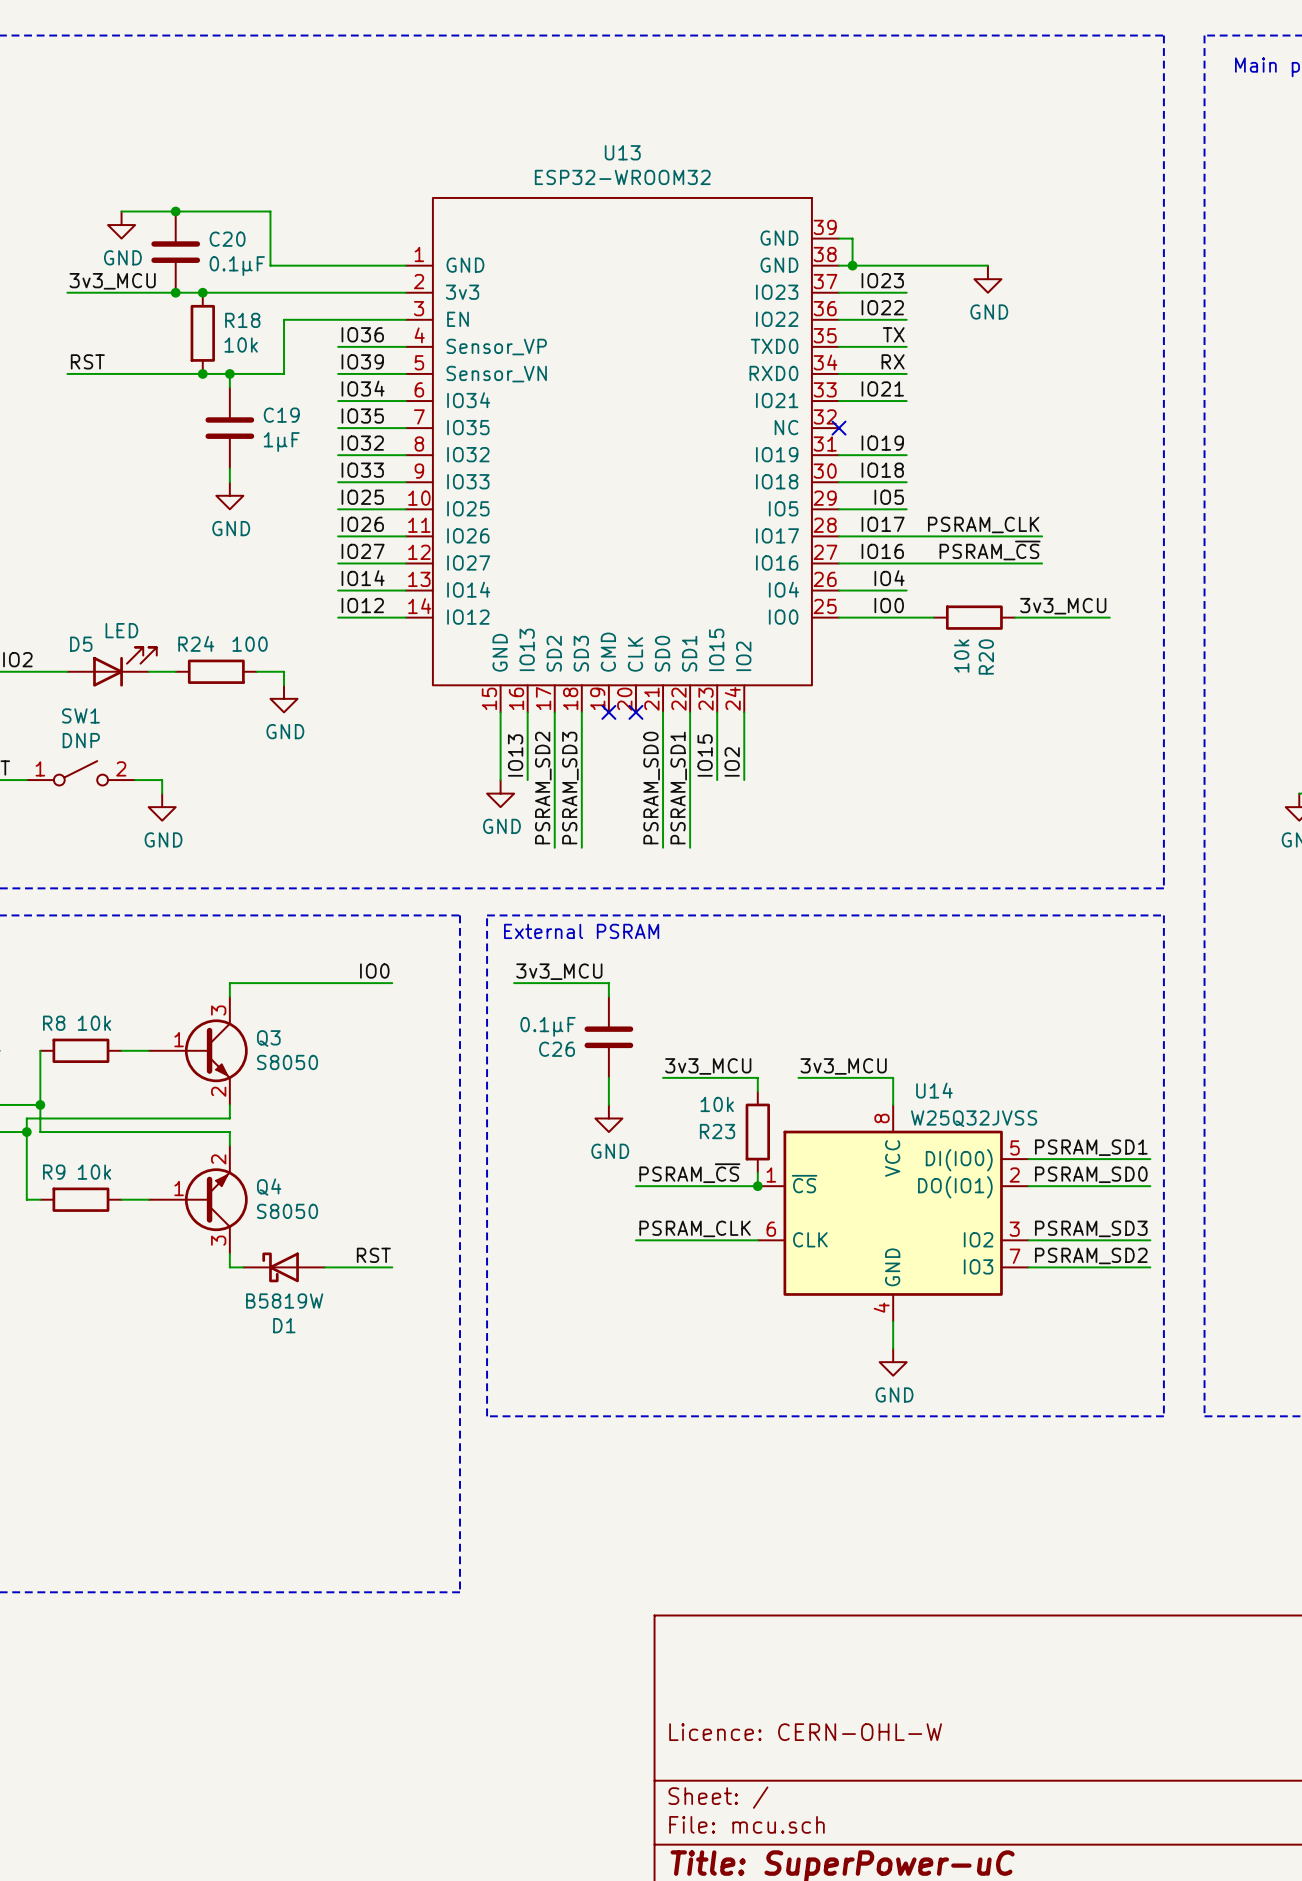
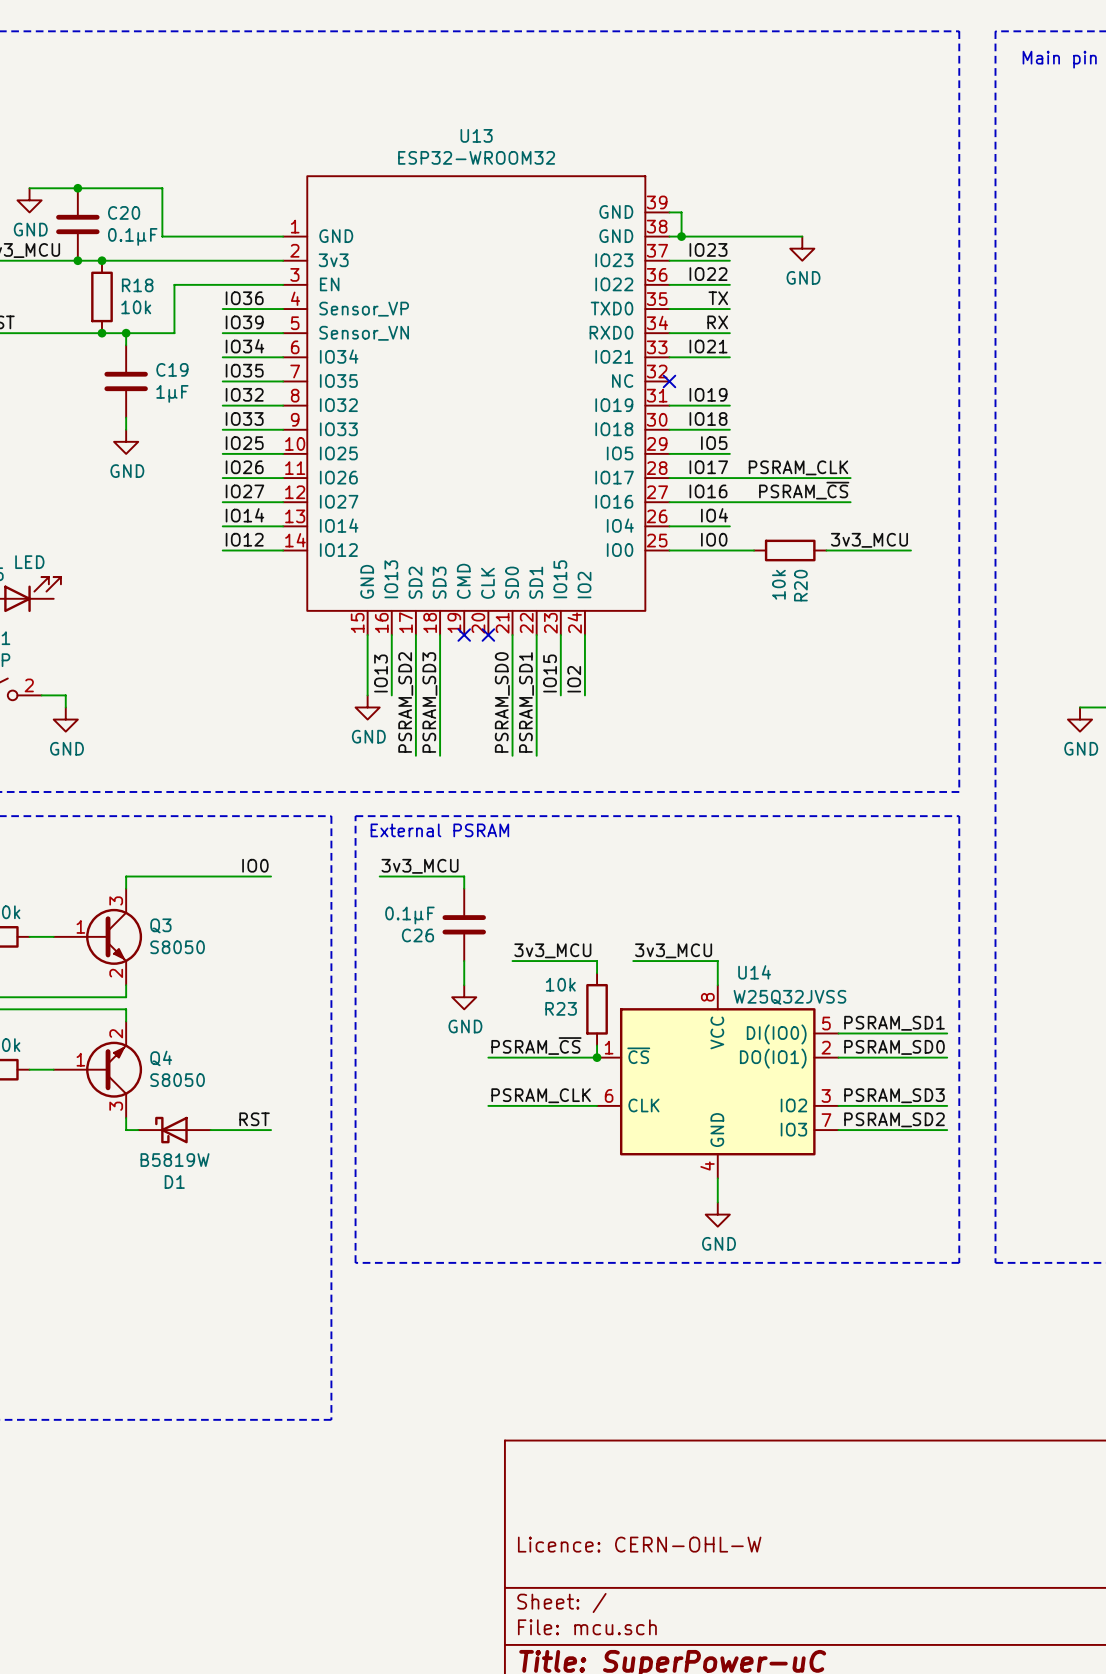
wire: (148, 671) (175, 671) -> none
R24: 100 (216, 671) -> none
wire: (256, 671) (284, 671) (284, 685) -> none
power symbol: GND (284, 698) -> none

